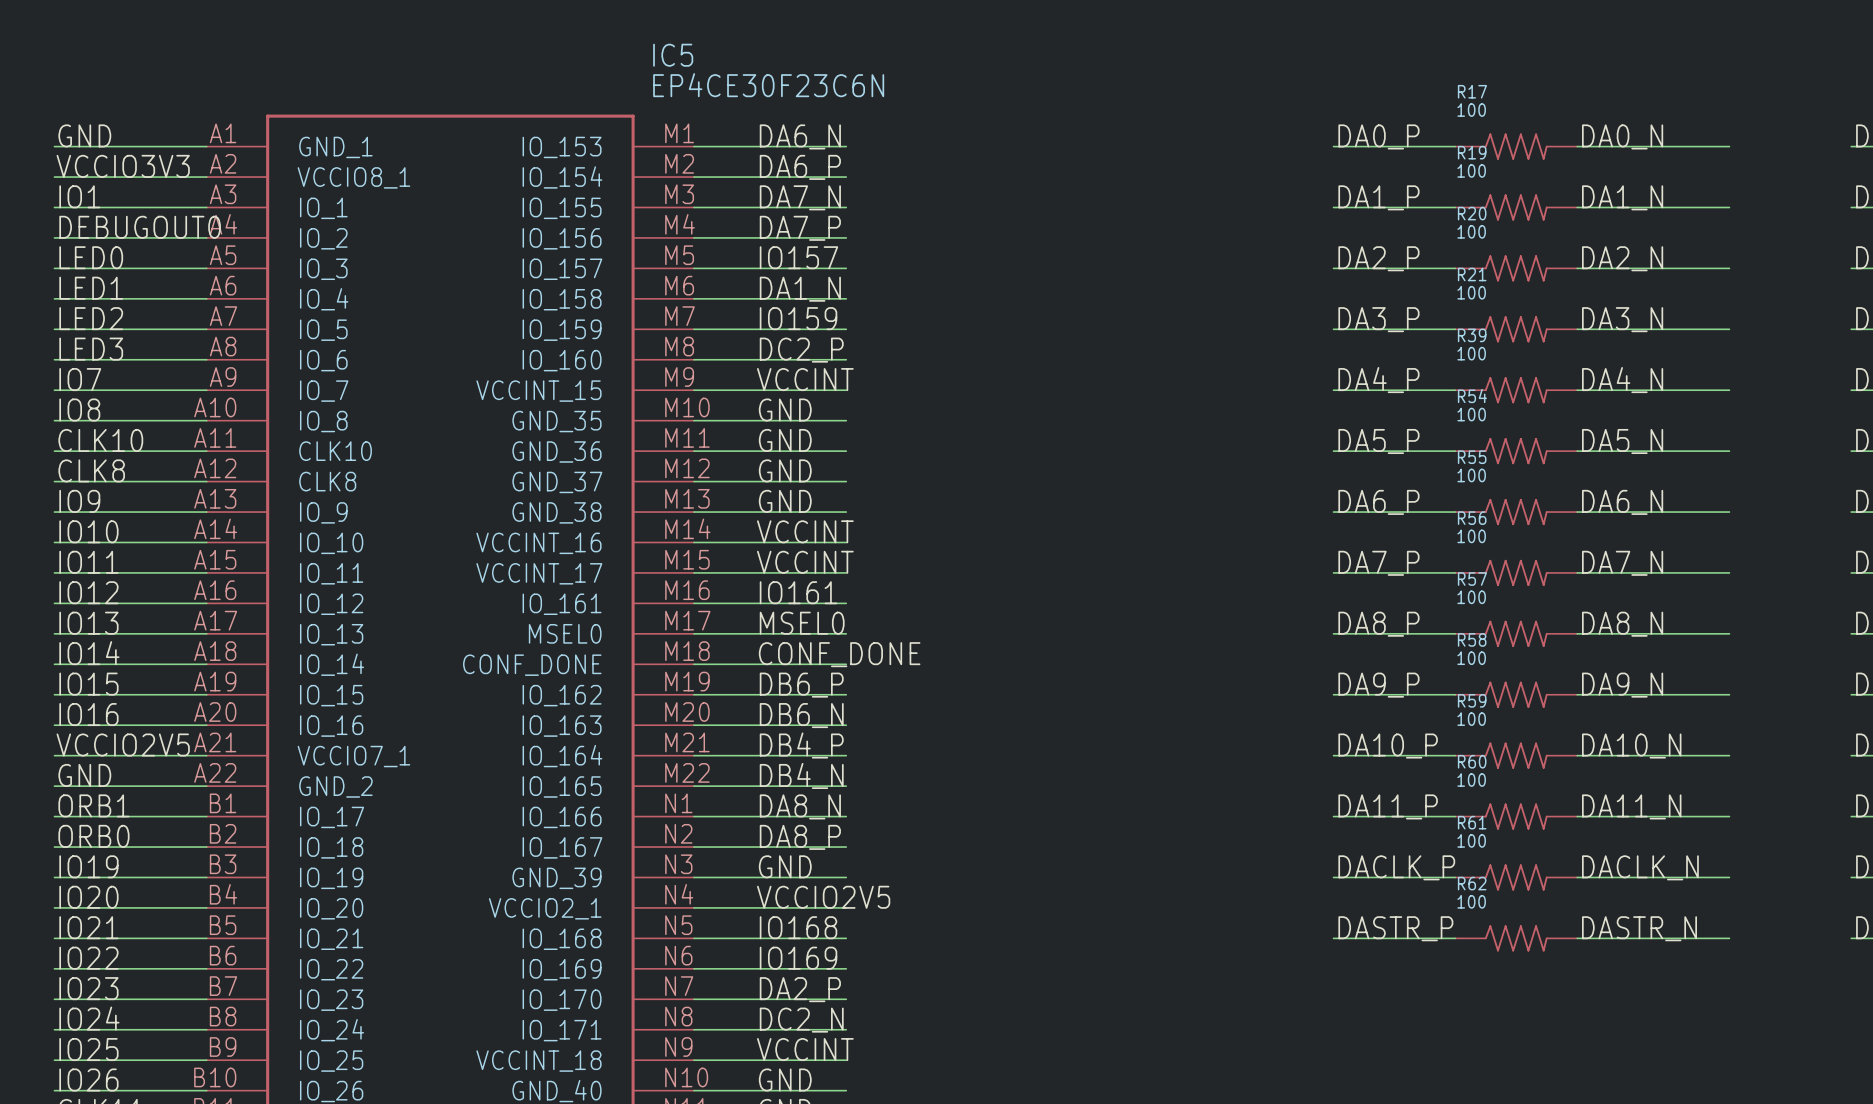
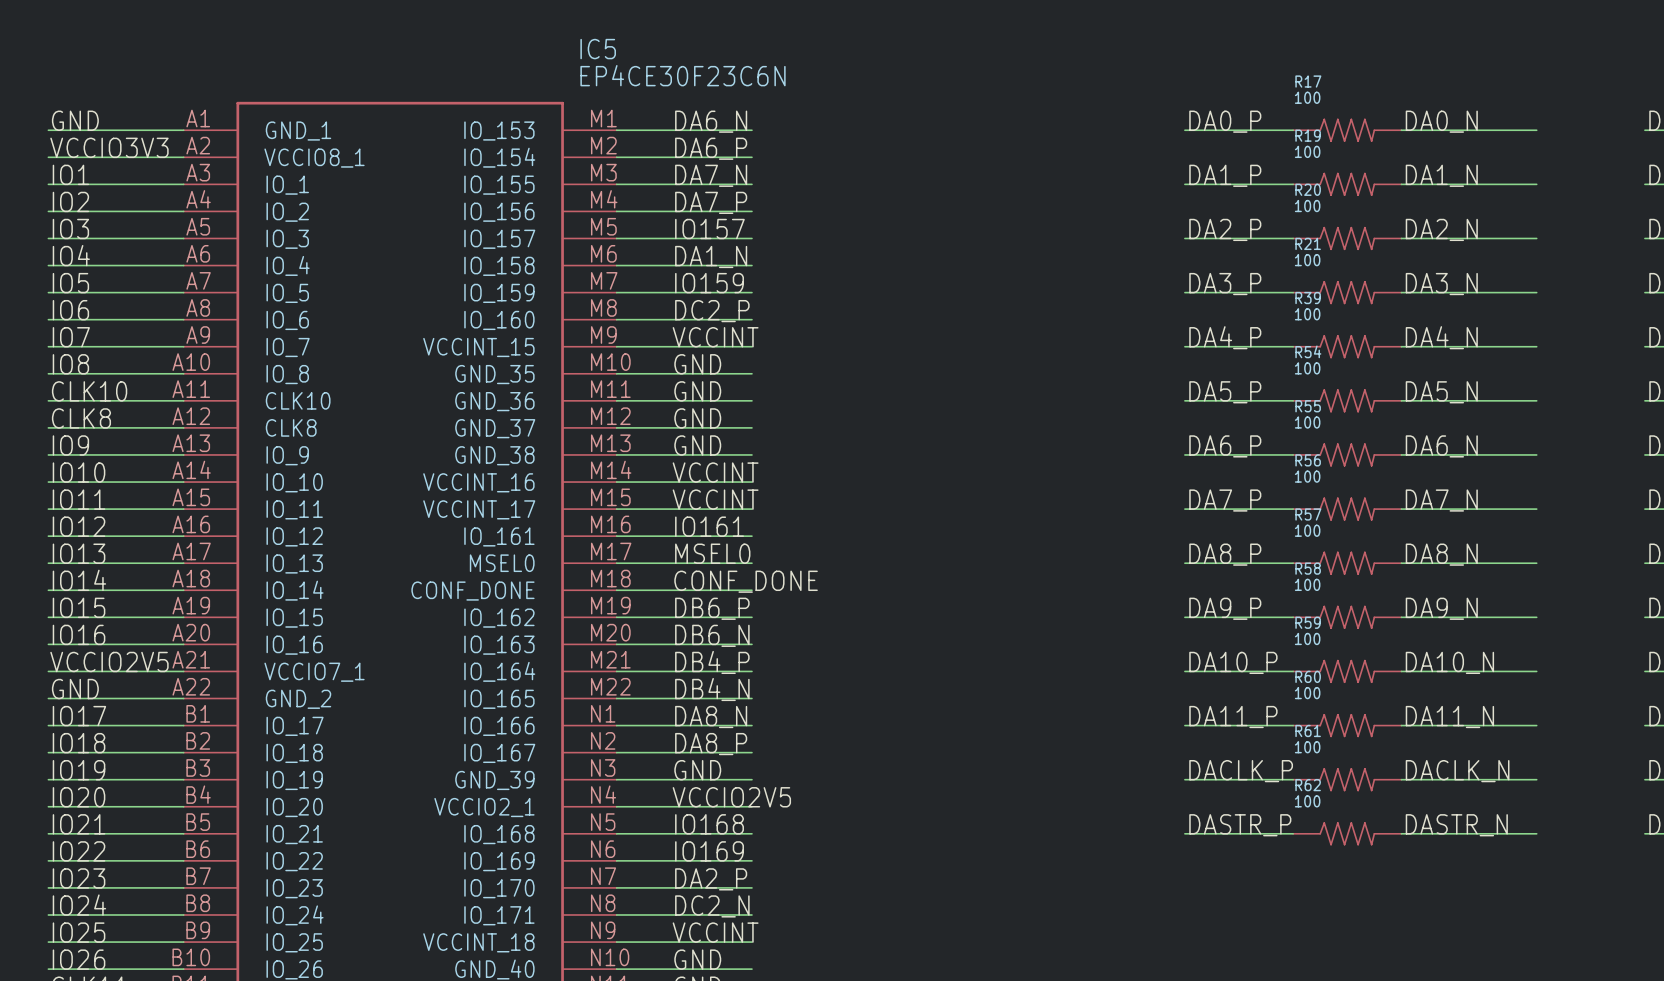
label: DEBUGOUT0 (140, 227) -> IO2 (70, 201)
label: LED0 (91, 257) -> IO3 (70, 229)
label: LED1 (91, 288) -> IO4 (71, 255)
label: LED2 (91, 318) -> IO5 (70, 283)
label: LED3 (91, 349) -> IO6 (70, 310)
label: ORB1 (93, 805) -> IO17 (79, 716)
label: ORB0 (93, 836) -> IO18 (79, 743)

